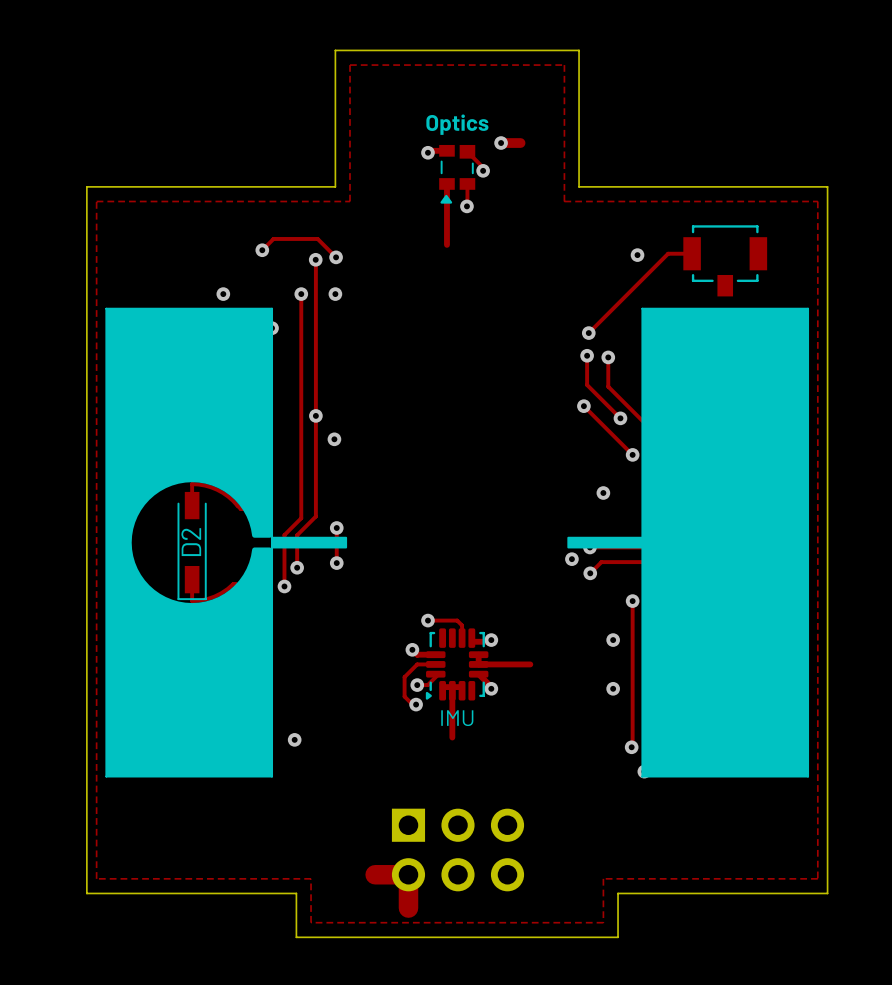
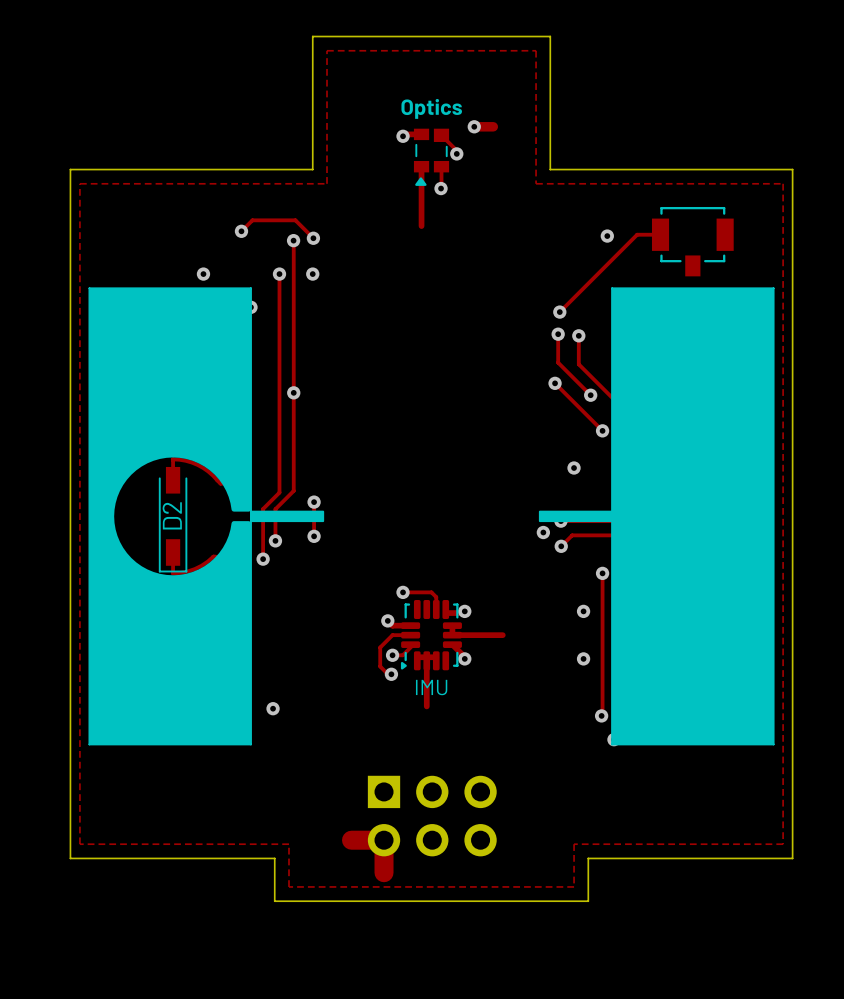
via: (334, 439) -> none

